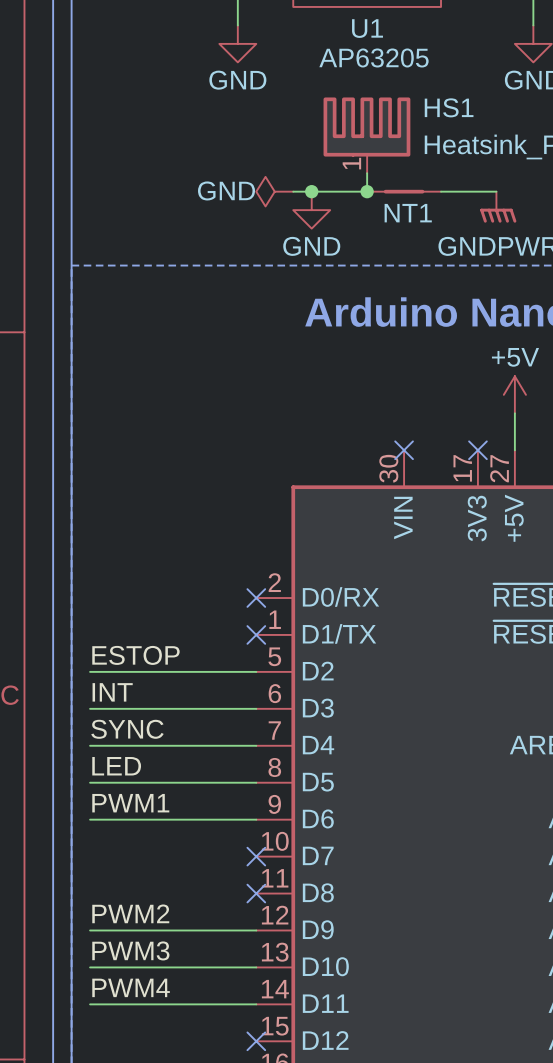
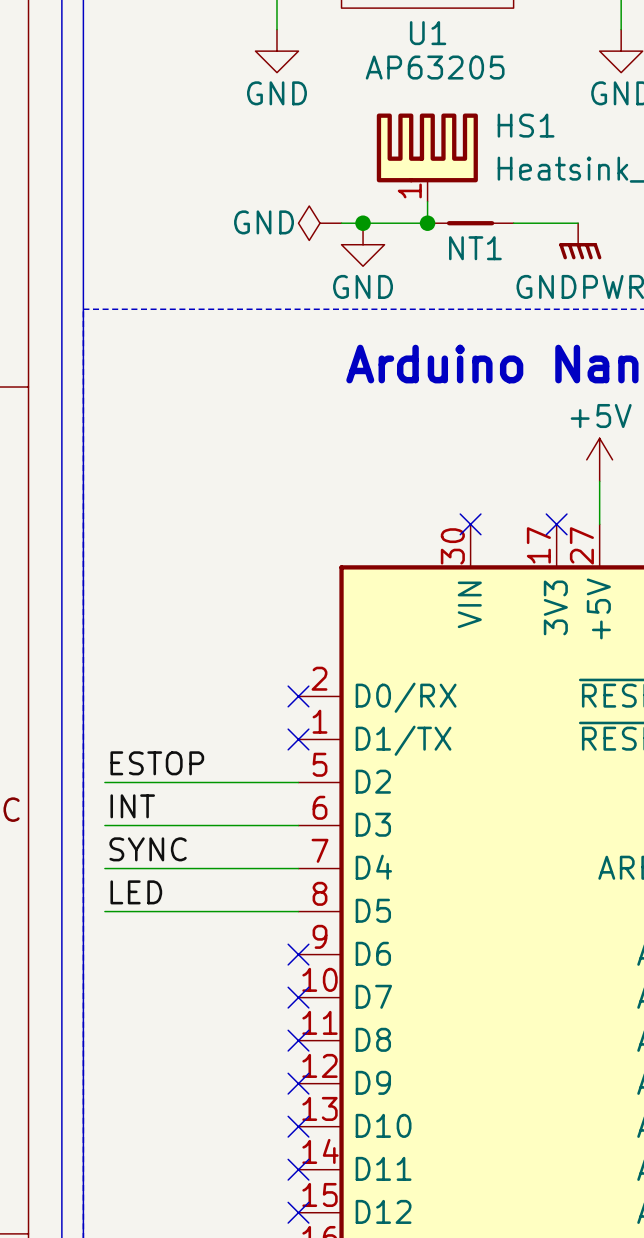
label: PWM1 (130, 803) -> none
wire: (90, 819) (256, 819) -> none
no-connect mark: none -> (298, 954)
label: PWM2 (130, 913) -> none
wire: (90, 930) (256, 930) -> none
no-connect mark: none -> (298, 1083)
label: PWM3 (130, 950) -> none
wire: (90, 967) (256, 967) -> none
no-connect mark: none -> (298, 1126)
label: PWM4 (131, 987) -> none
wire: (90, 1004) (256, 1004) -> none
no-connect mark: none -> (298, 1169)

